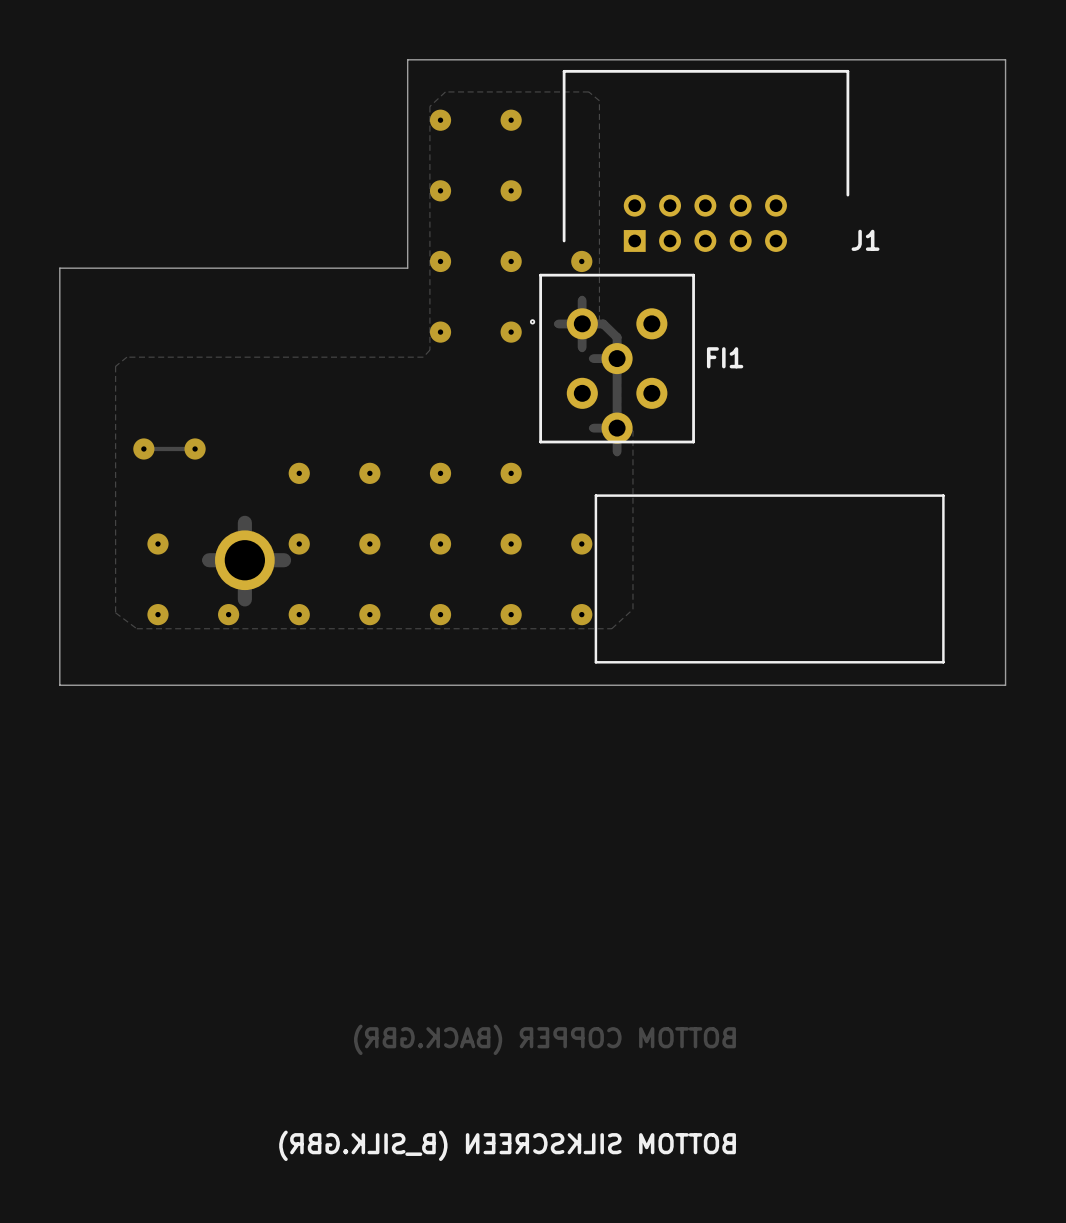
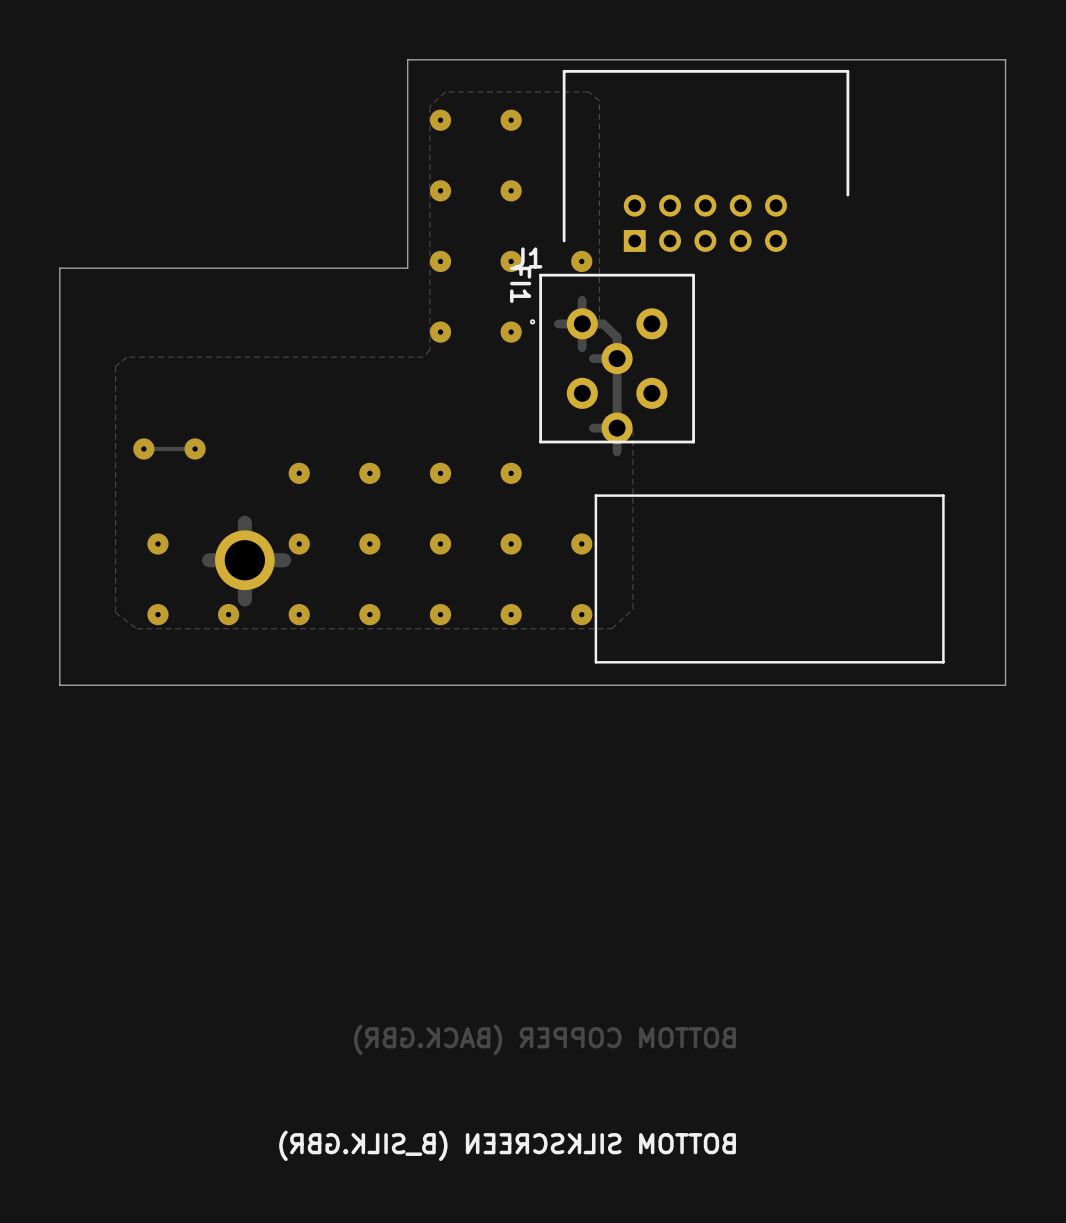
J1 name position: J1 (865, 240) -> J1 (528, 257)
FI1 name rotation: 0° (725, 357) -> 90° clockwise (520, 284)
FI1 name position: FI1 (725, 357) -> FI1 (520, 284)

